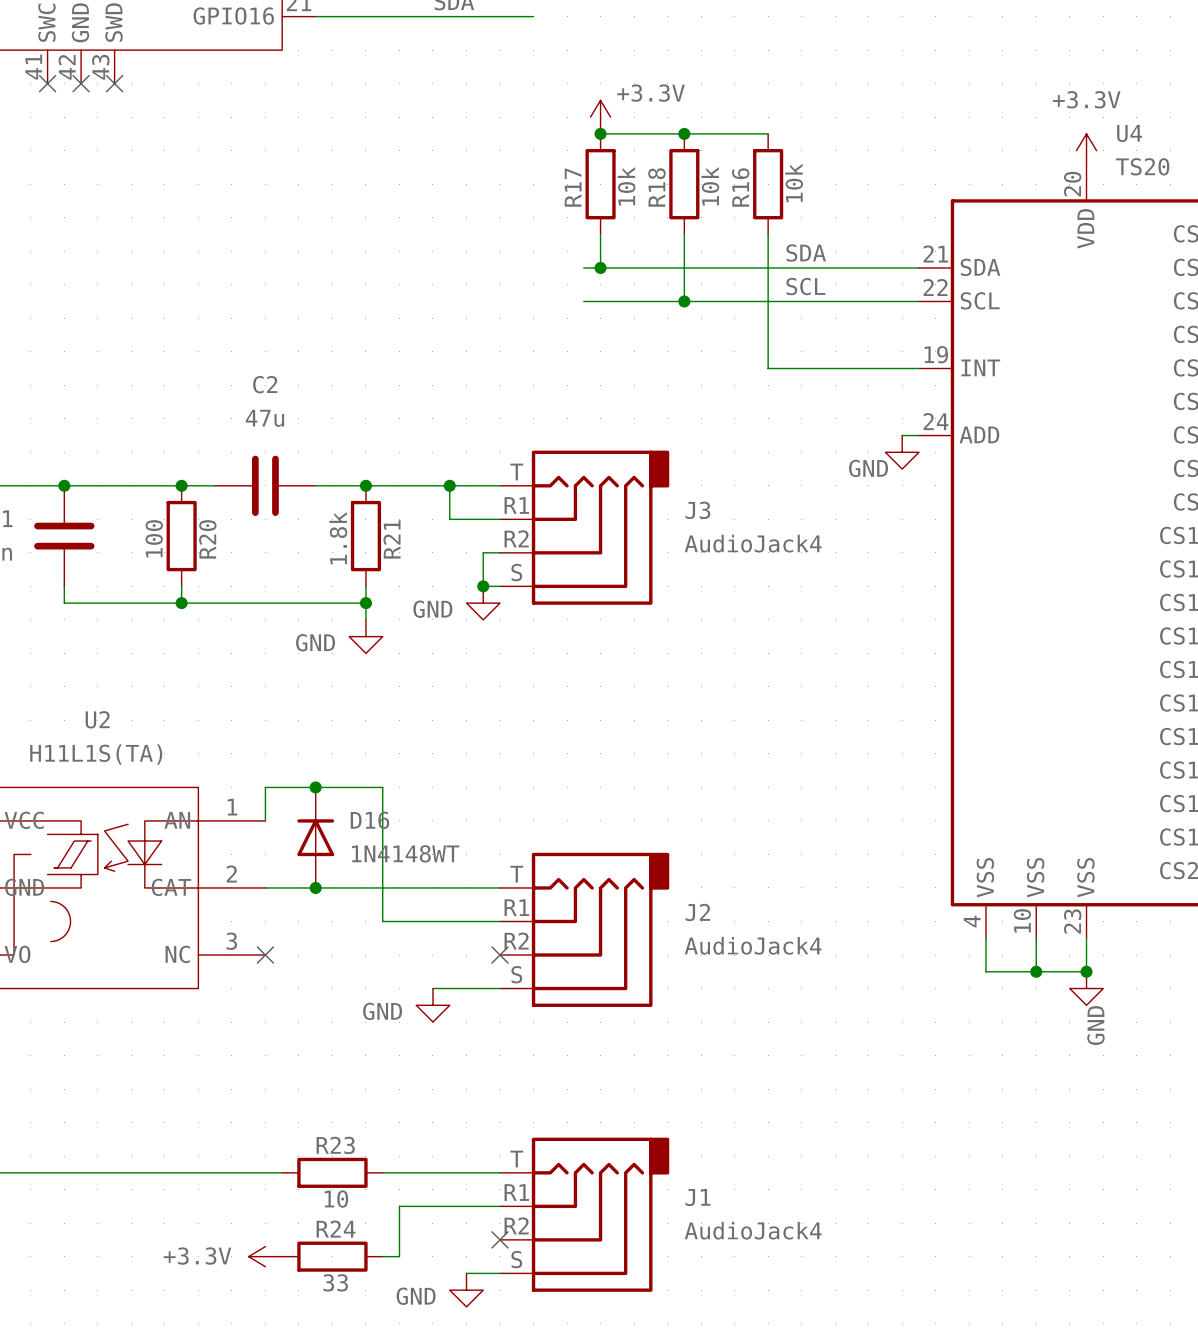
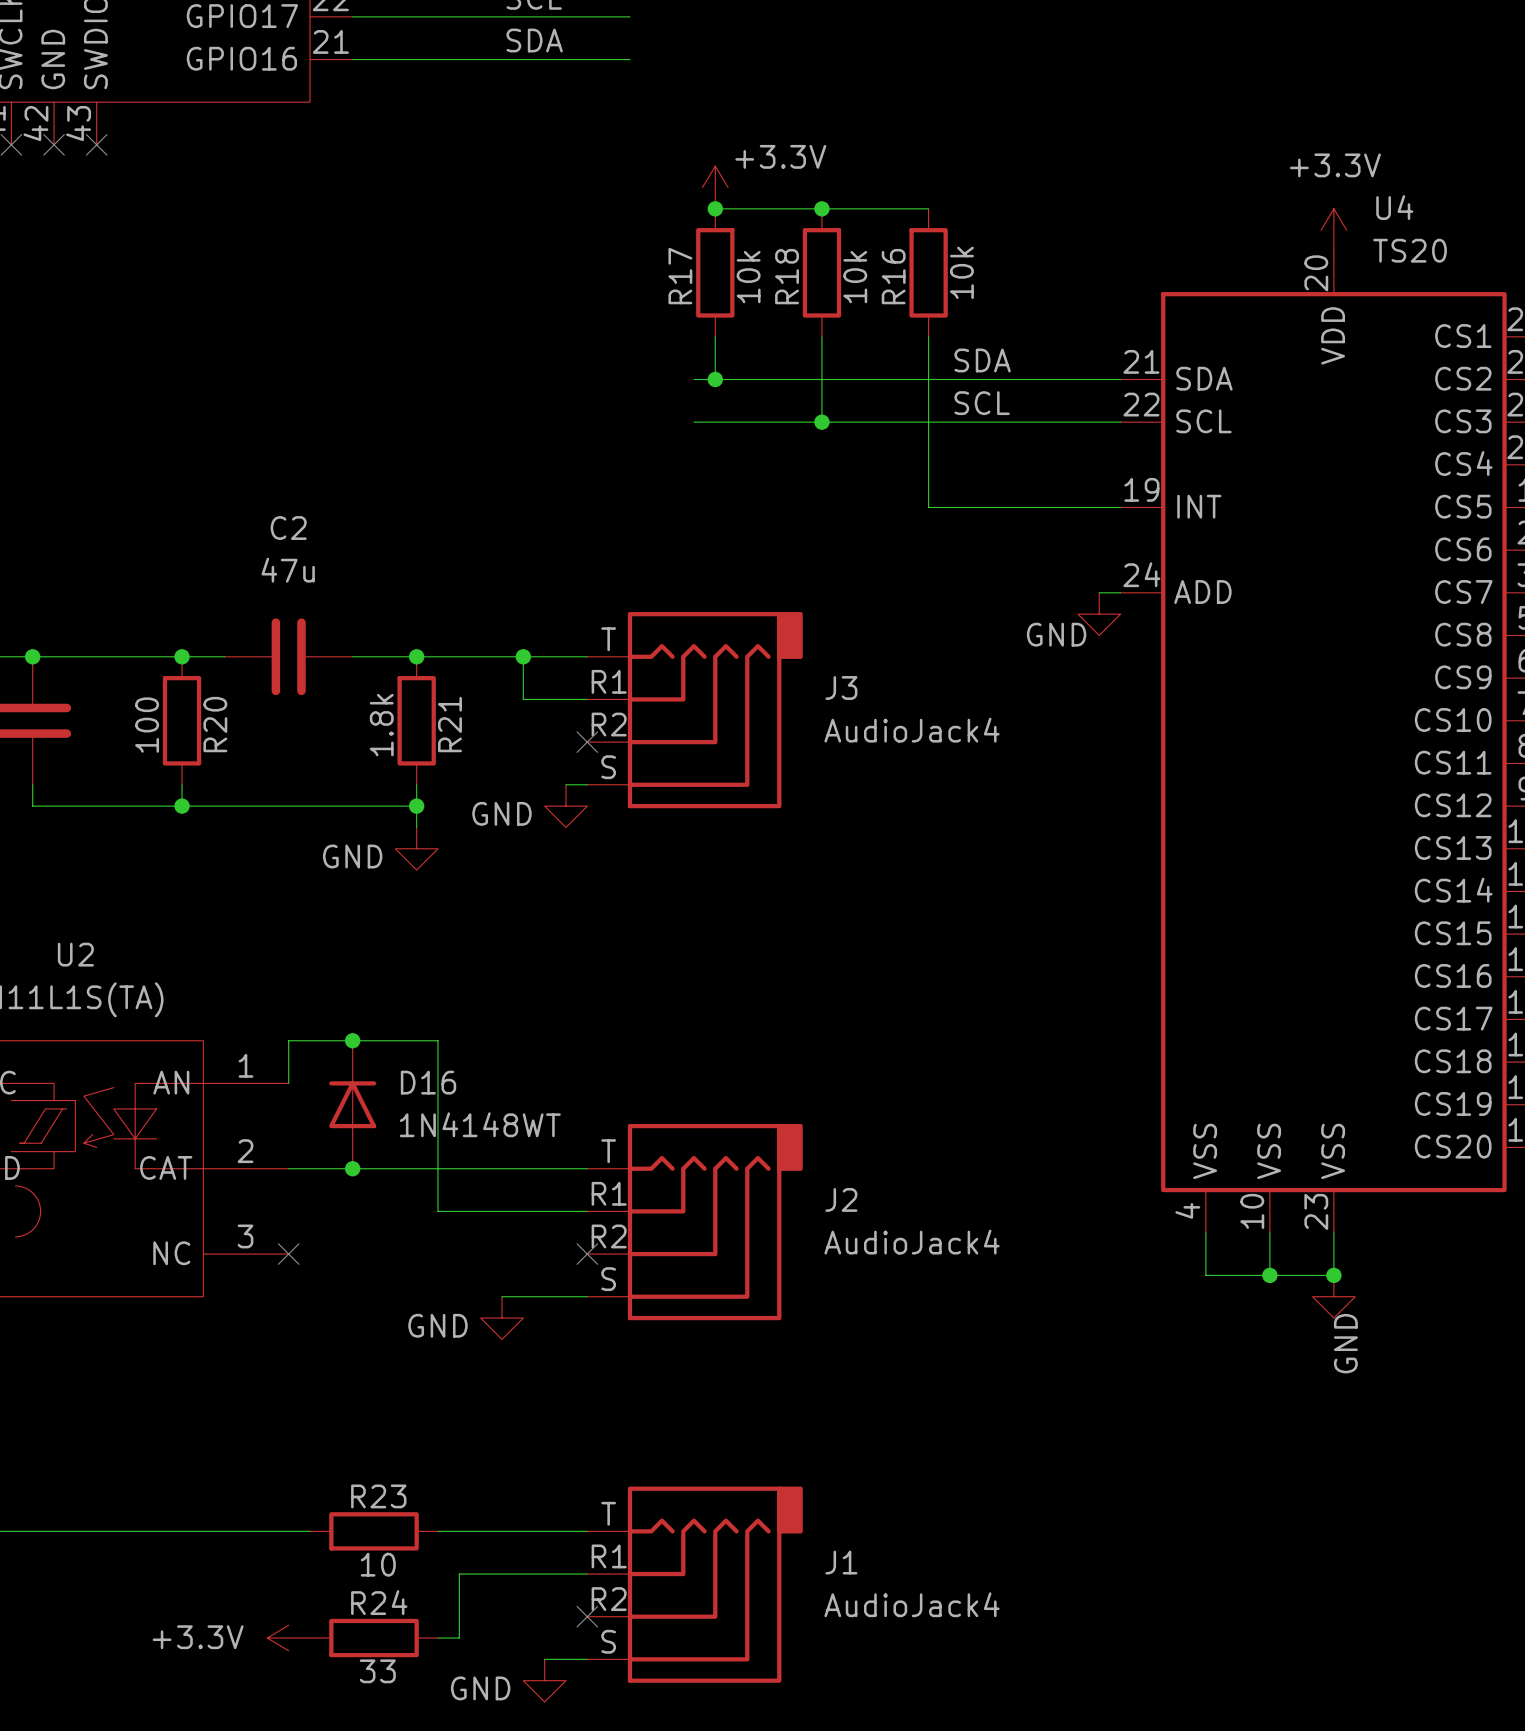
wire: (500, 552) (483, 552) (483, 586) -> none
no-connect mark: none -> (587, 742)
junction: (483, 586) -> none

